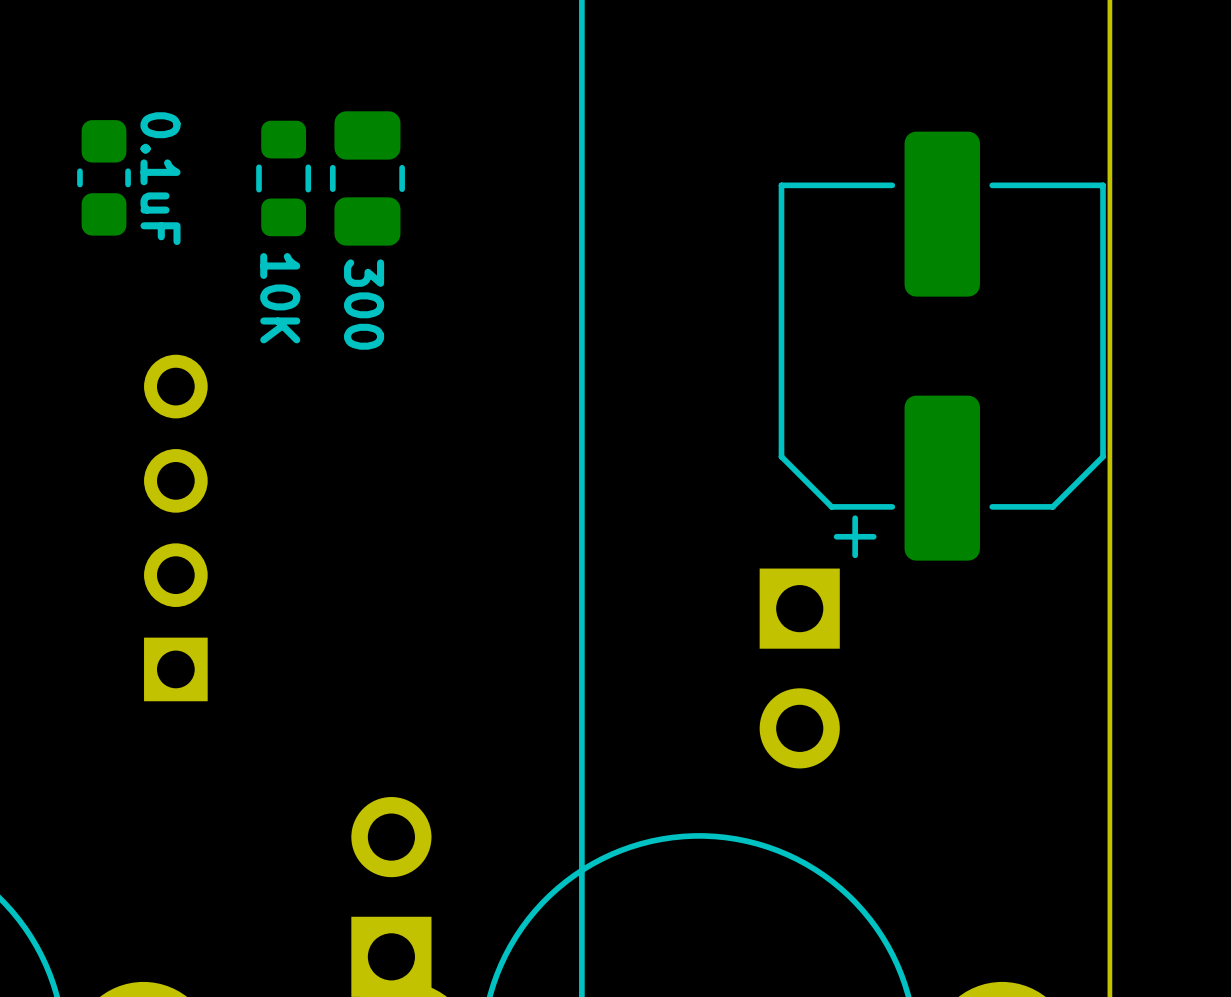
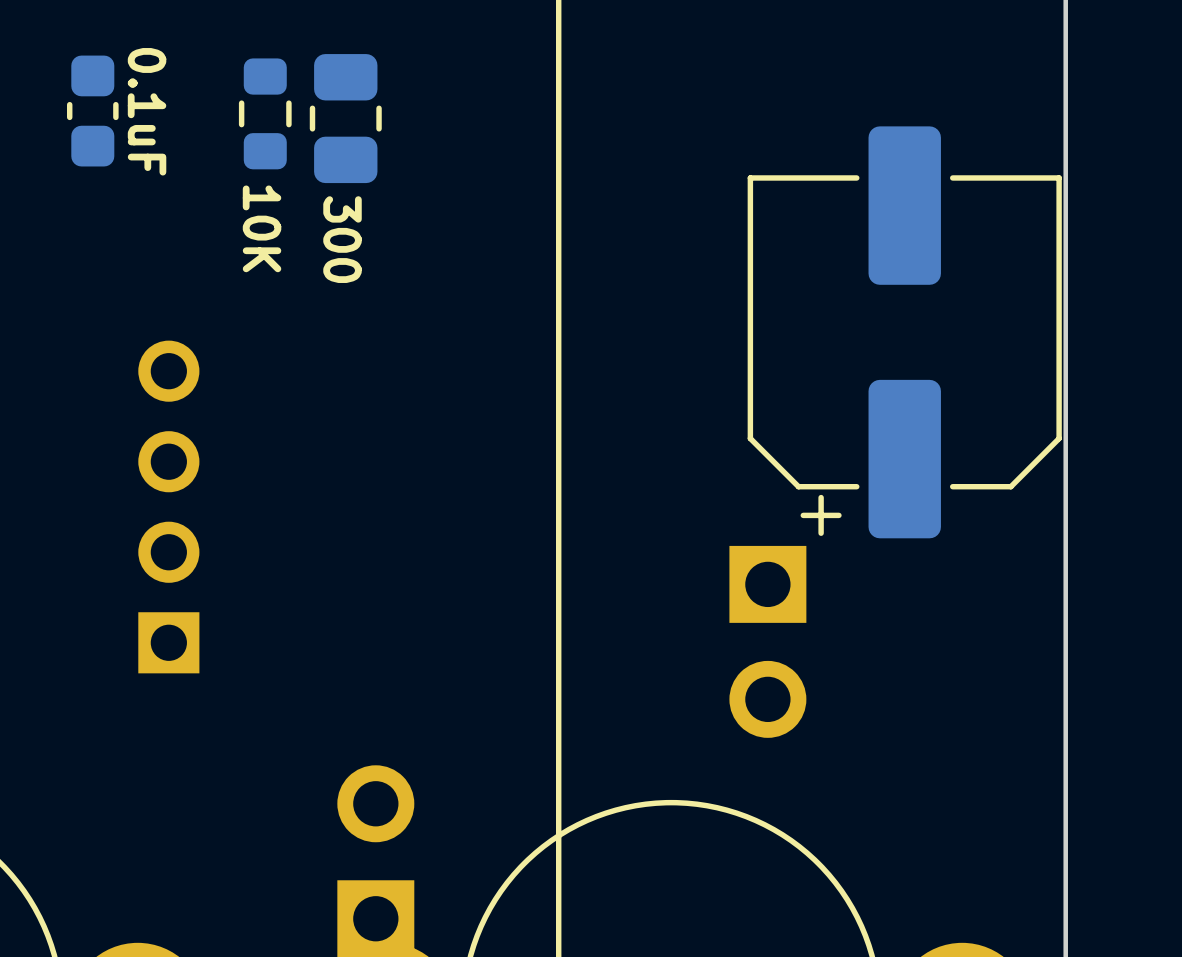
part position: (104, 177) -> (92, 111)
part position: (283, 178) -> (265, 113)
part position: (367, 178) -> (345, 118)

